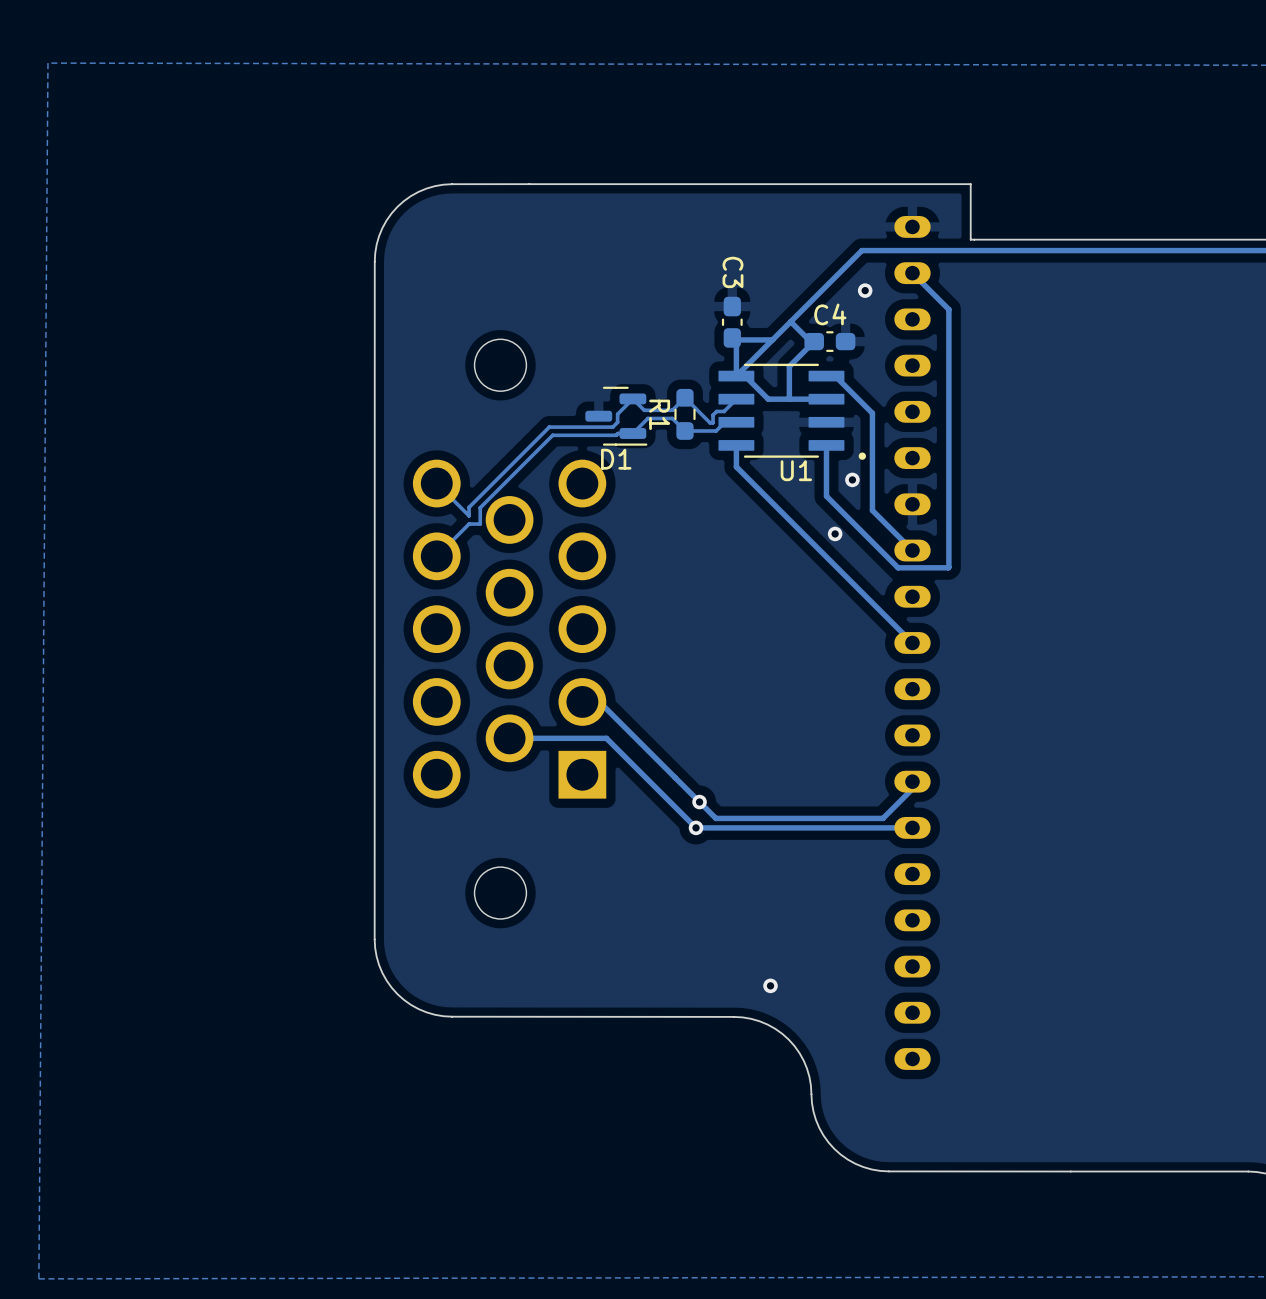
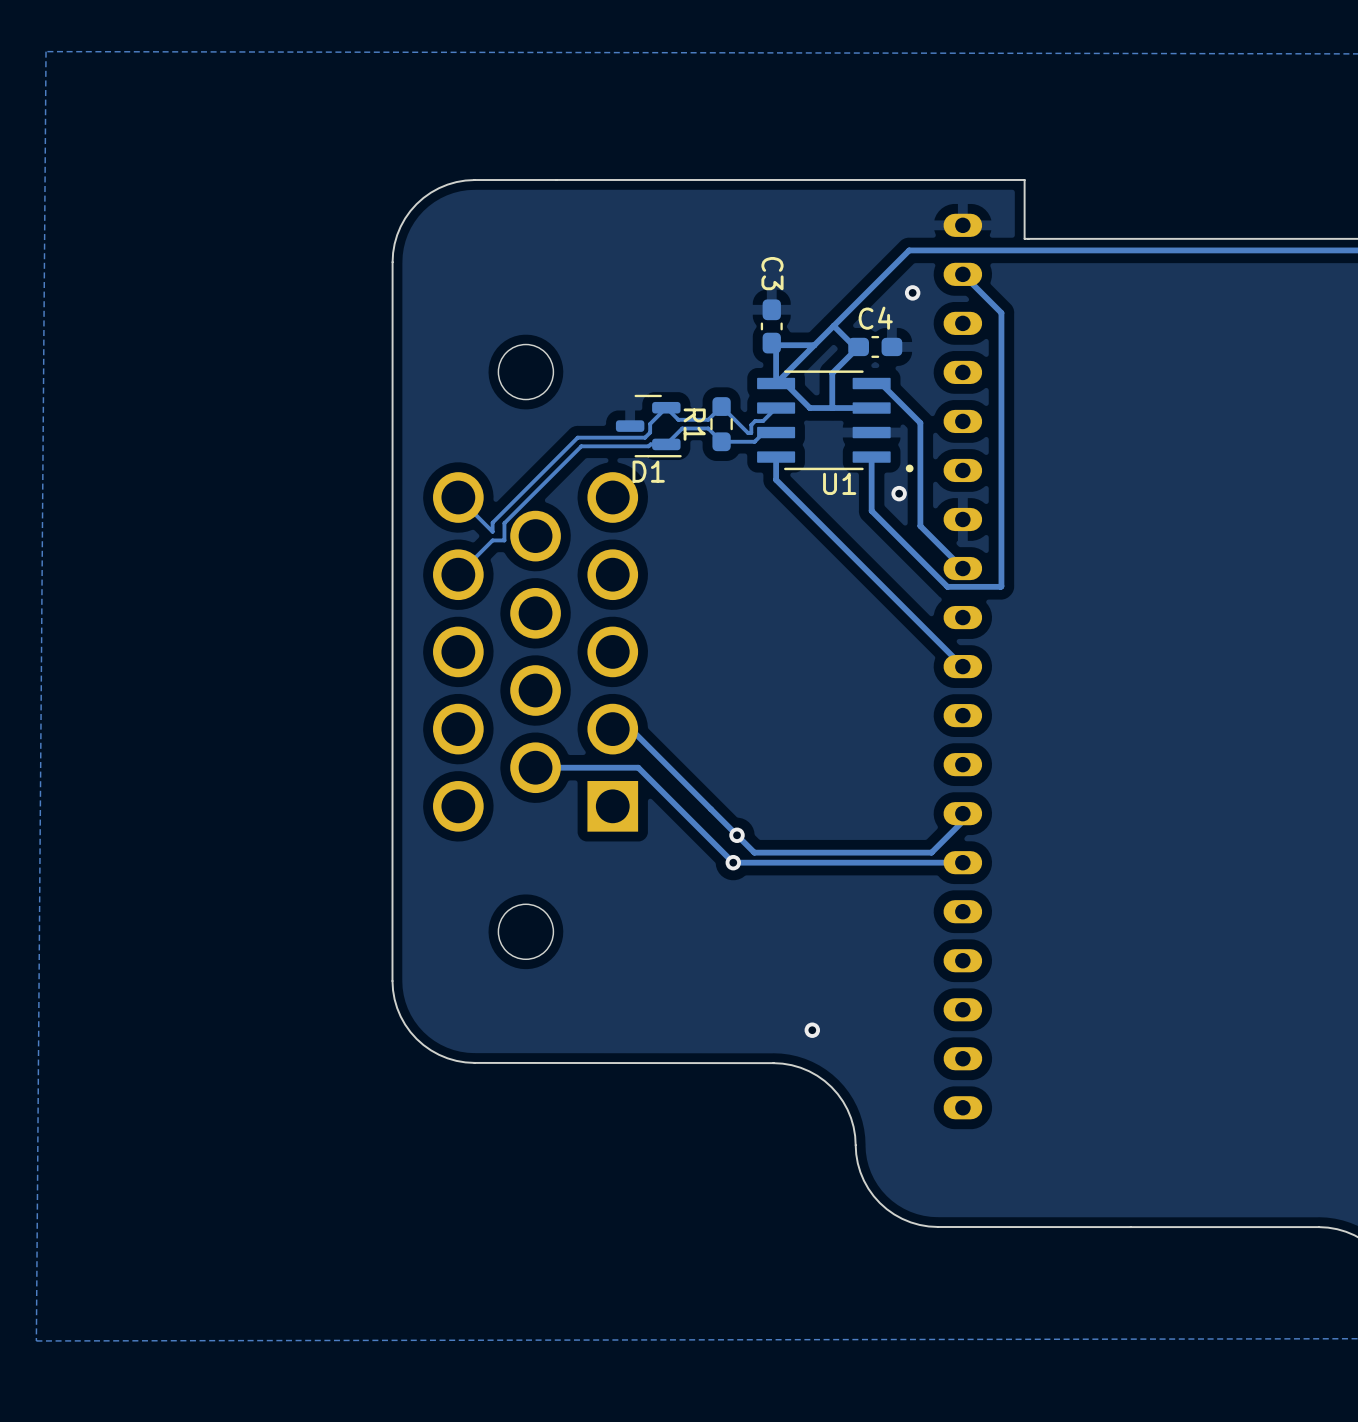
via: (835, 533) -> none

